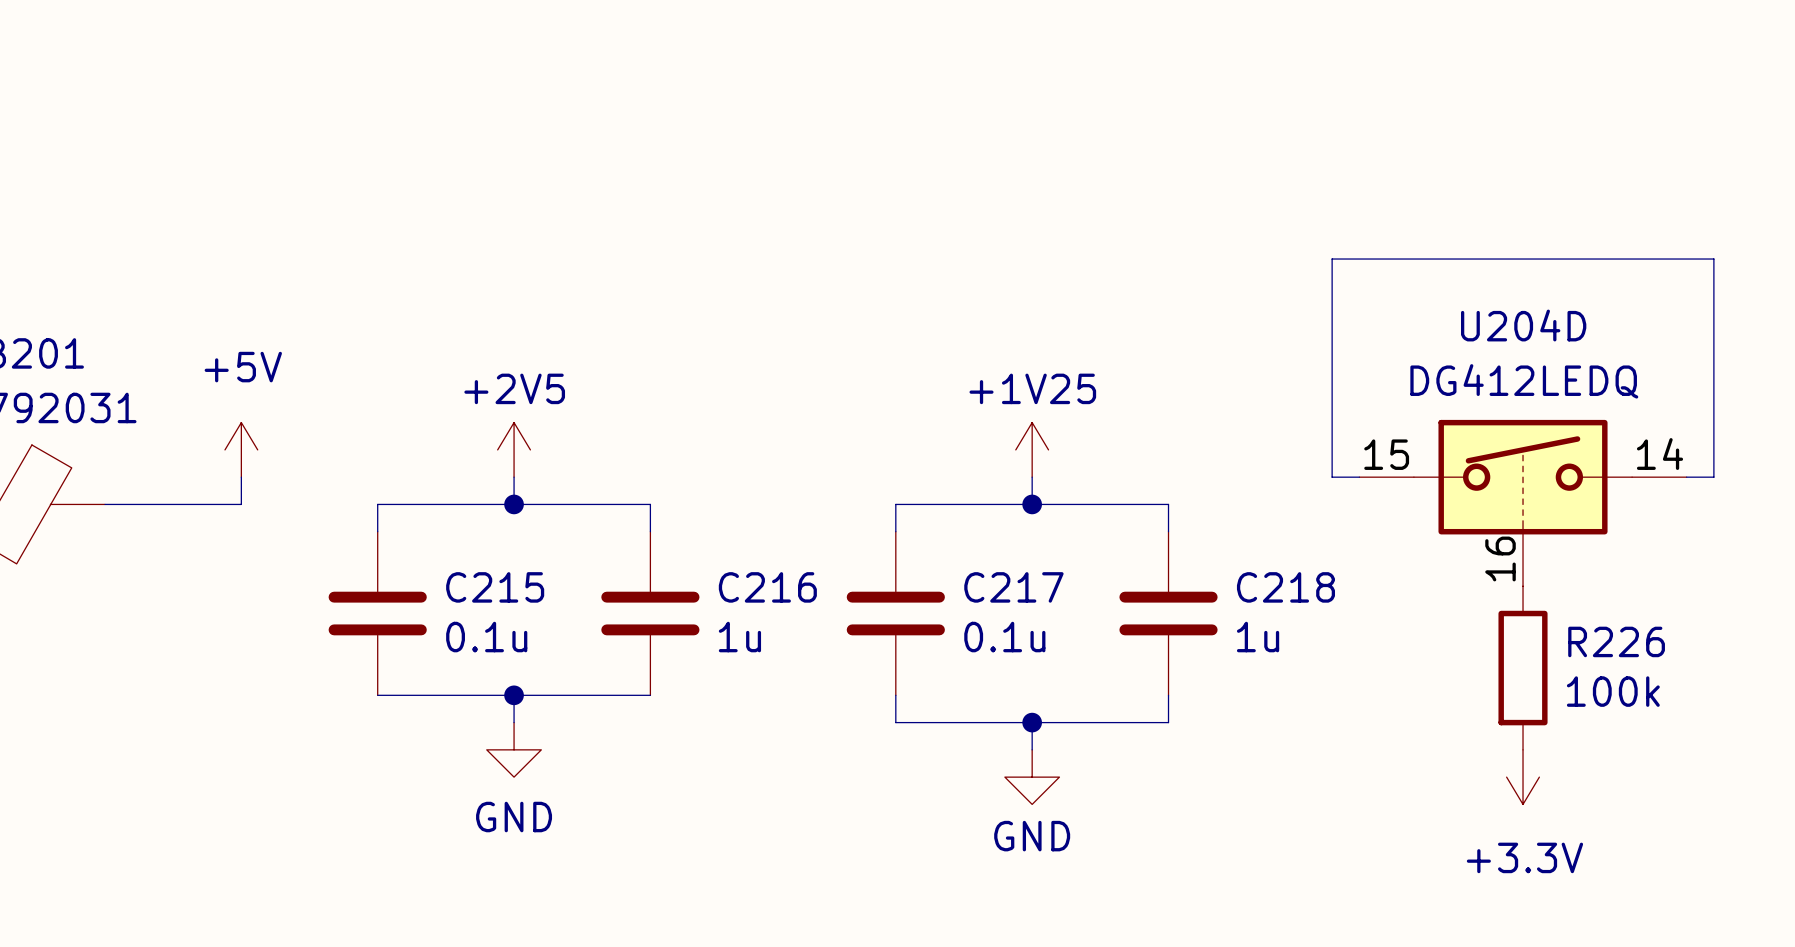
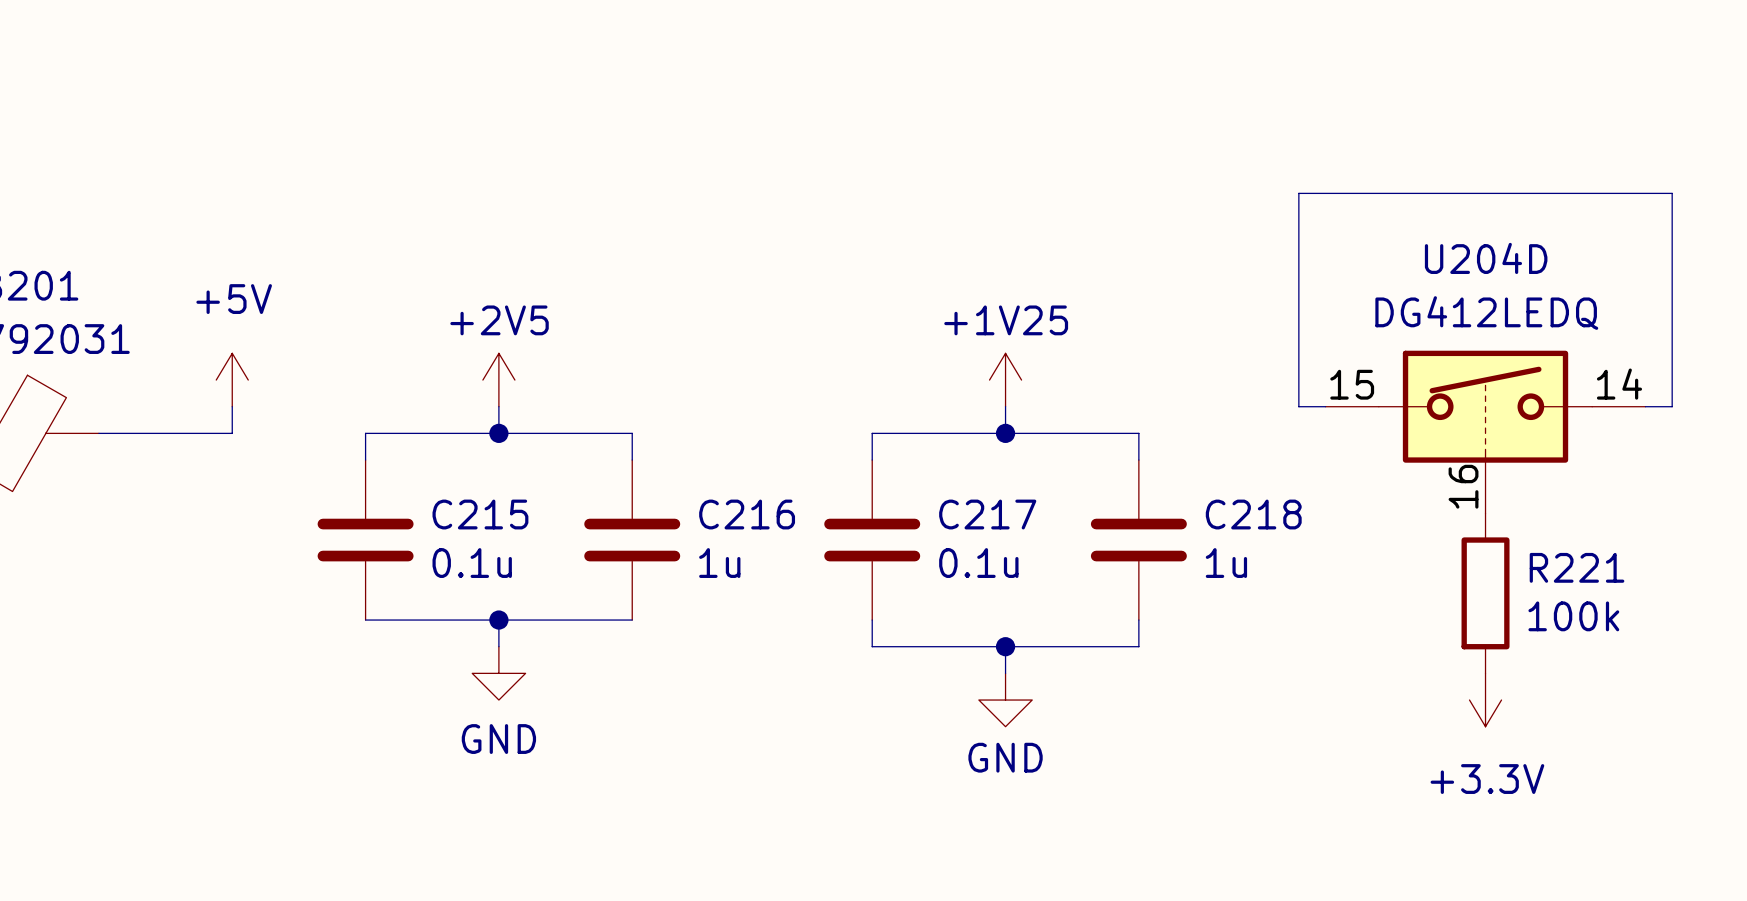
R226 name: R226 (1616, 641) -> R221 (1577, 567)

